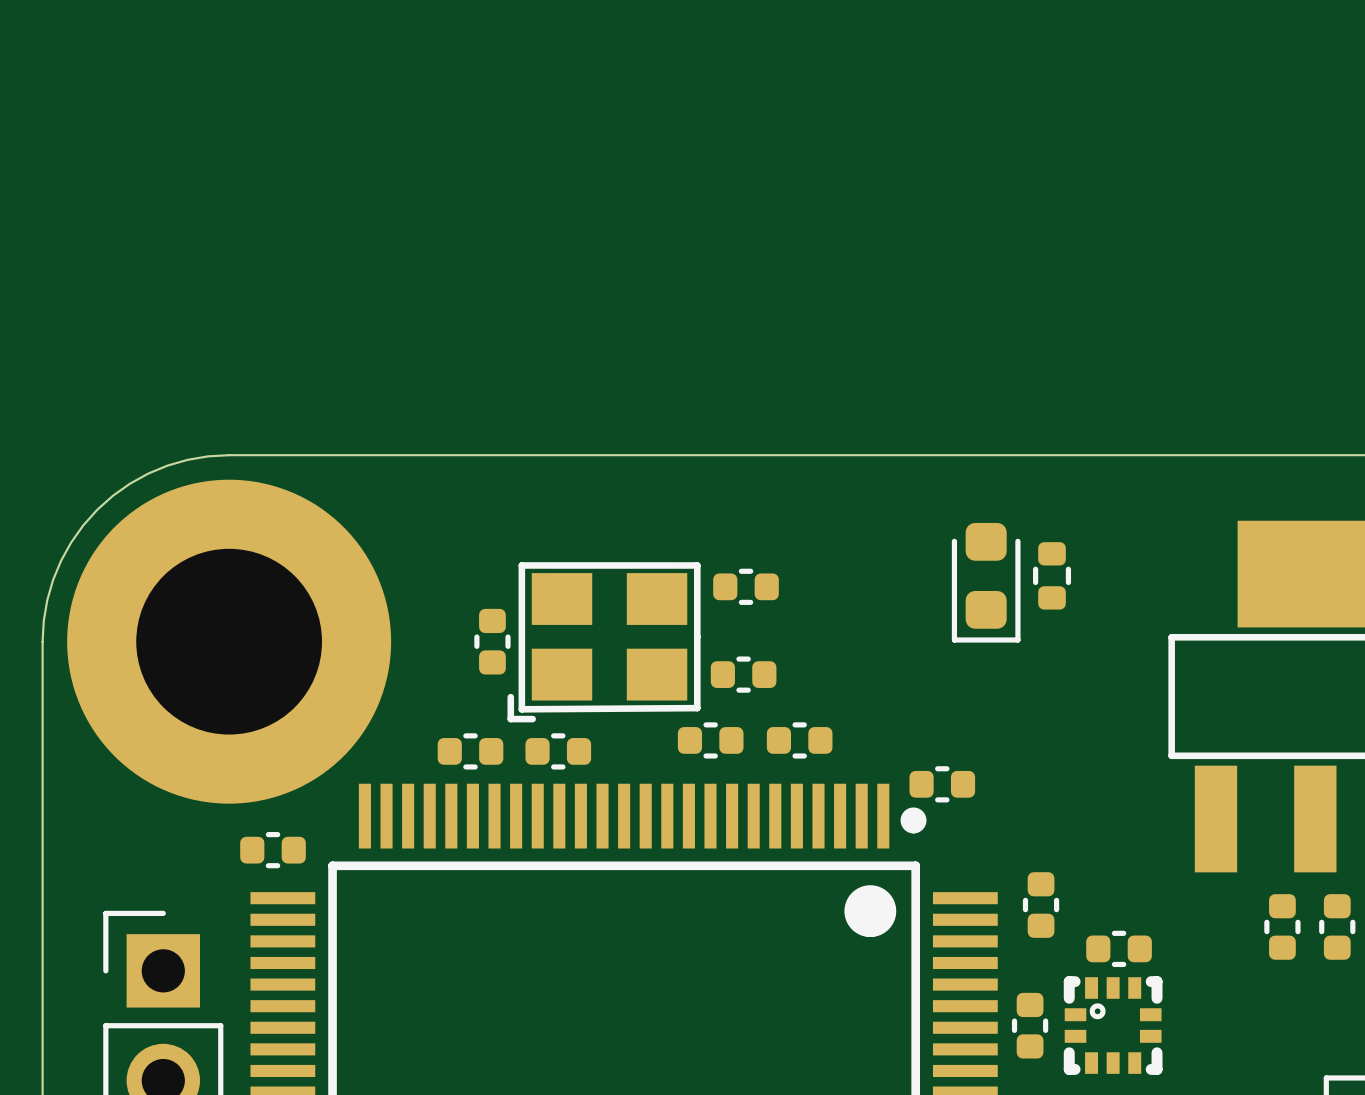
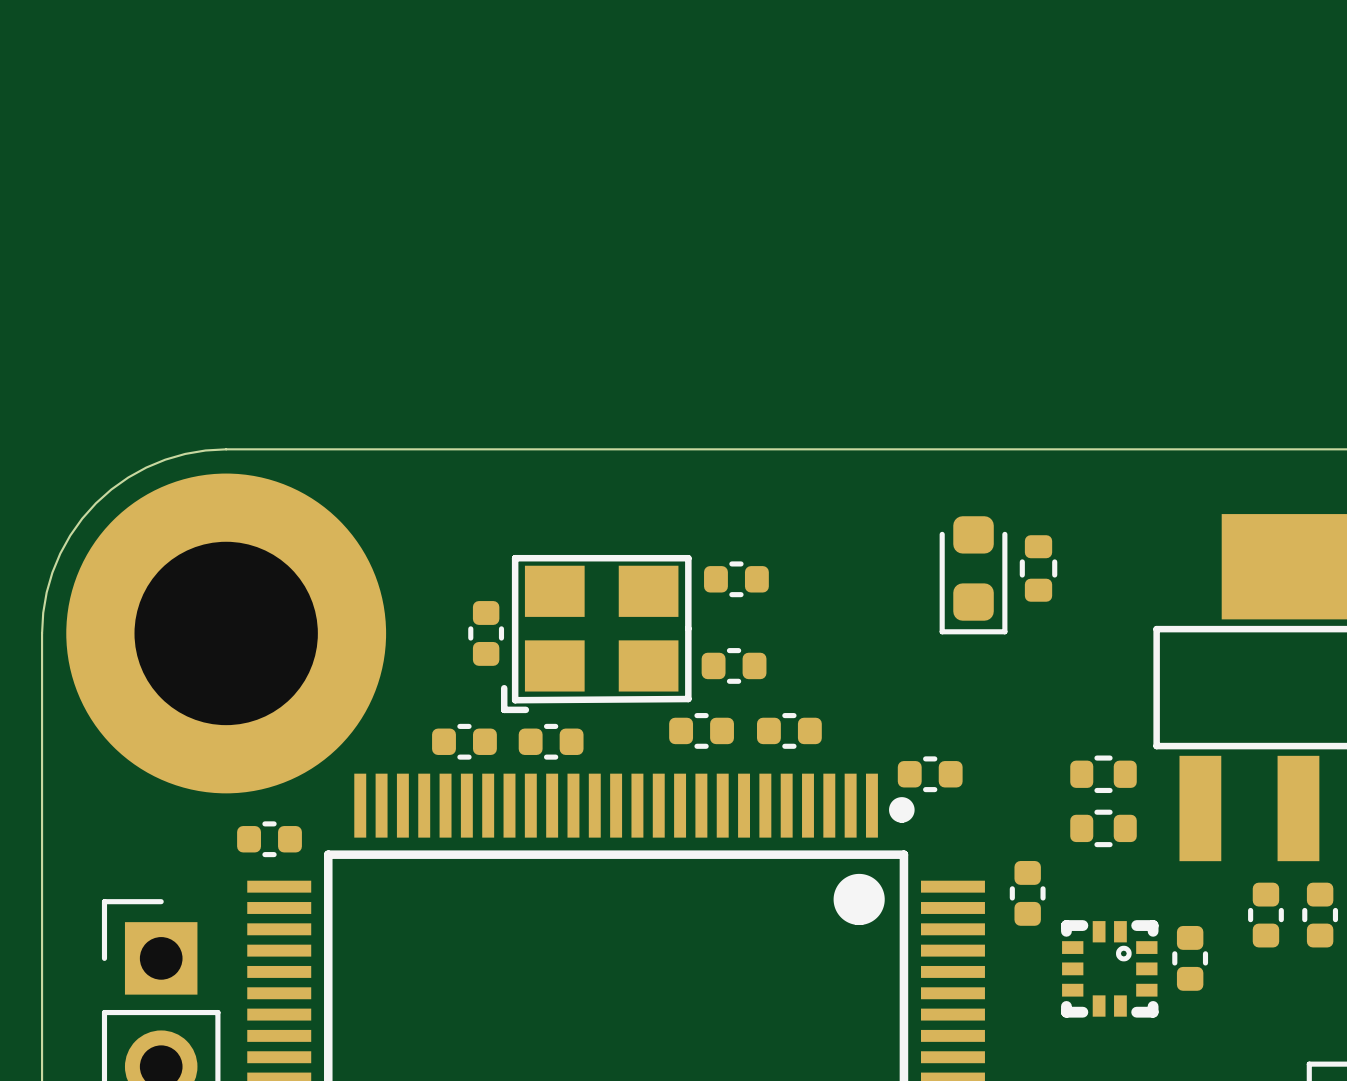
part: none -> (1103, 774)
part: none -> (1103, 828)
part rotation: 0° (1119, 948) -> 90° clockwise (1190, 958)
part position: (1119, 948) -> (1190, 958)
part: (1030, 1025) -> none
part rotation: 0° (1113, 1025) -> 90° clockwise (1109, 968)

